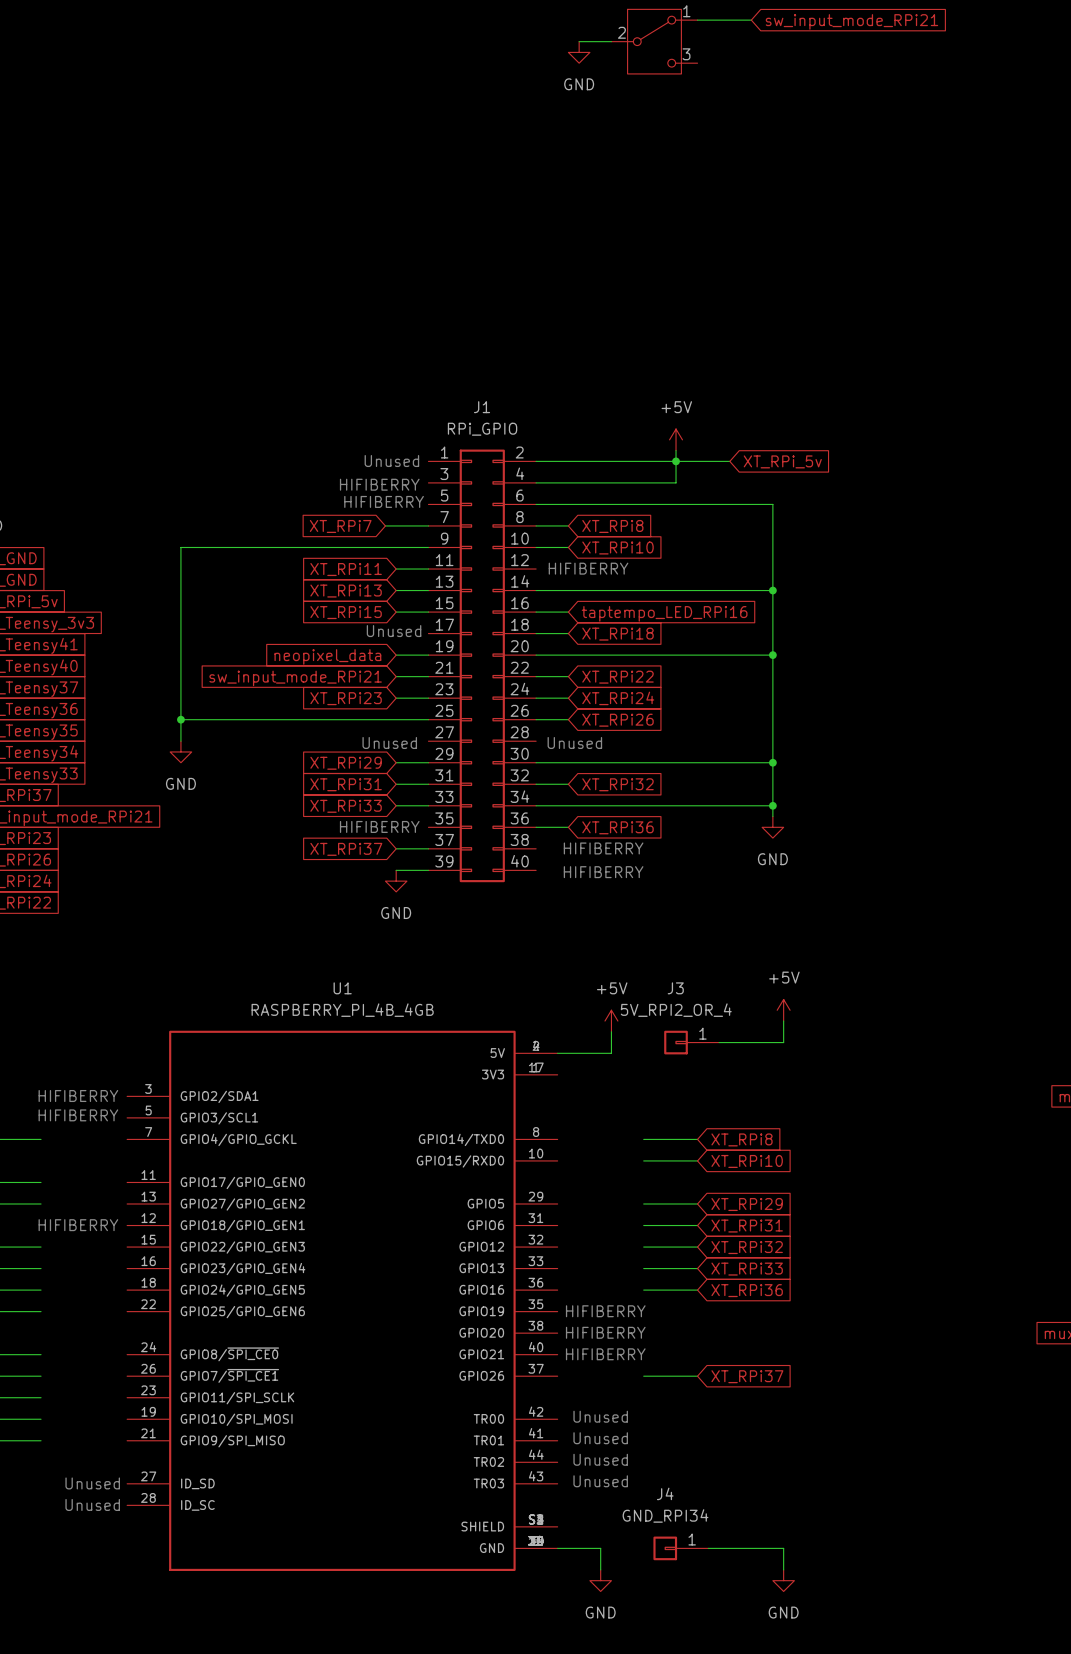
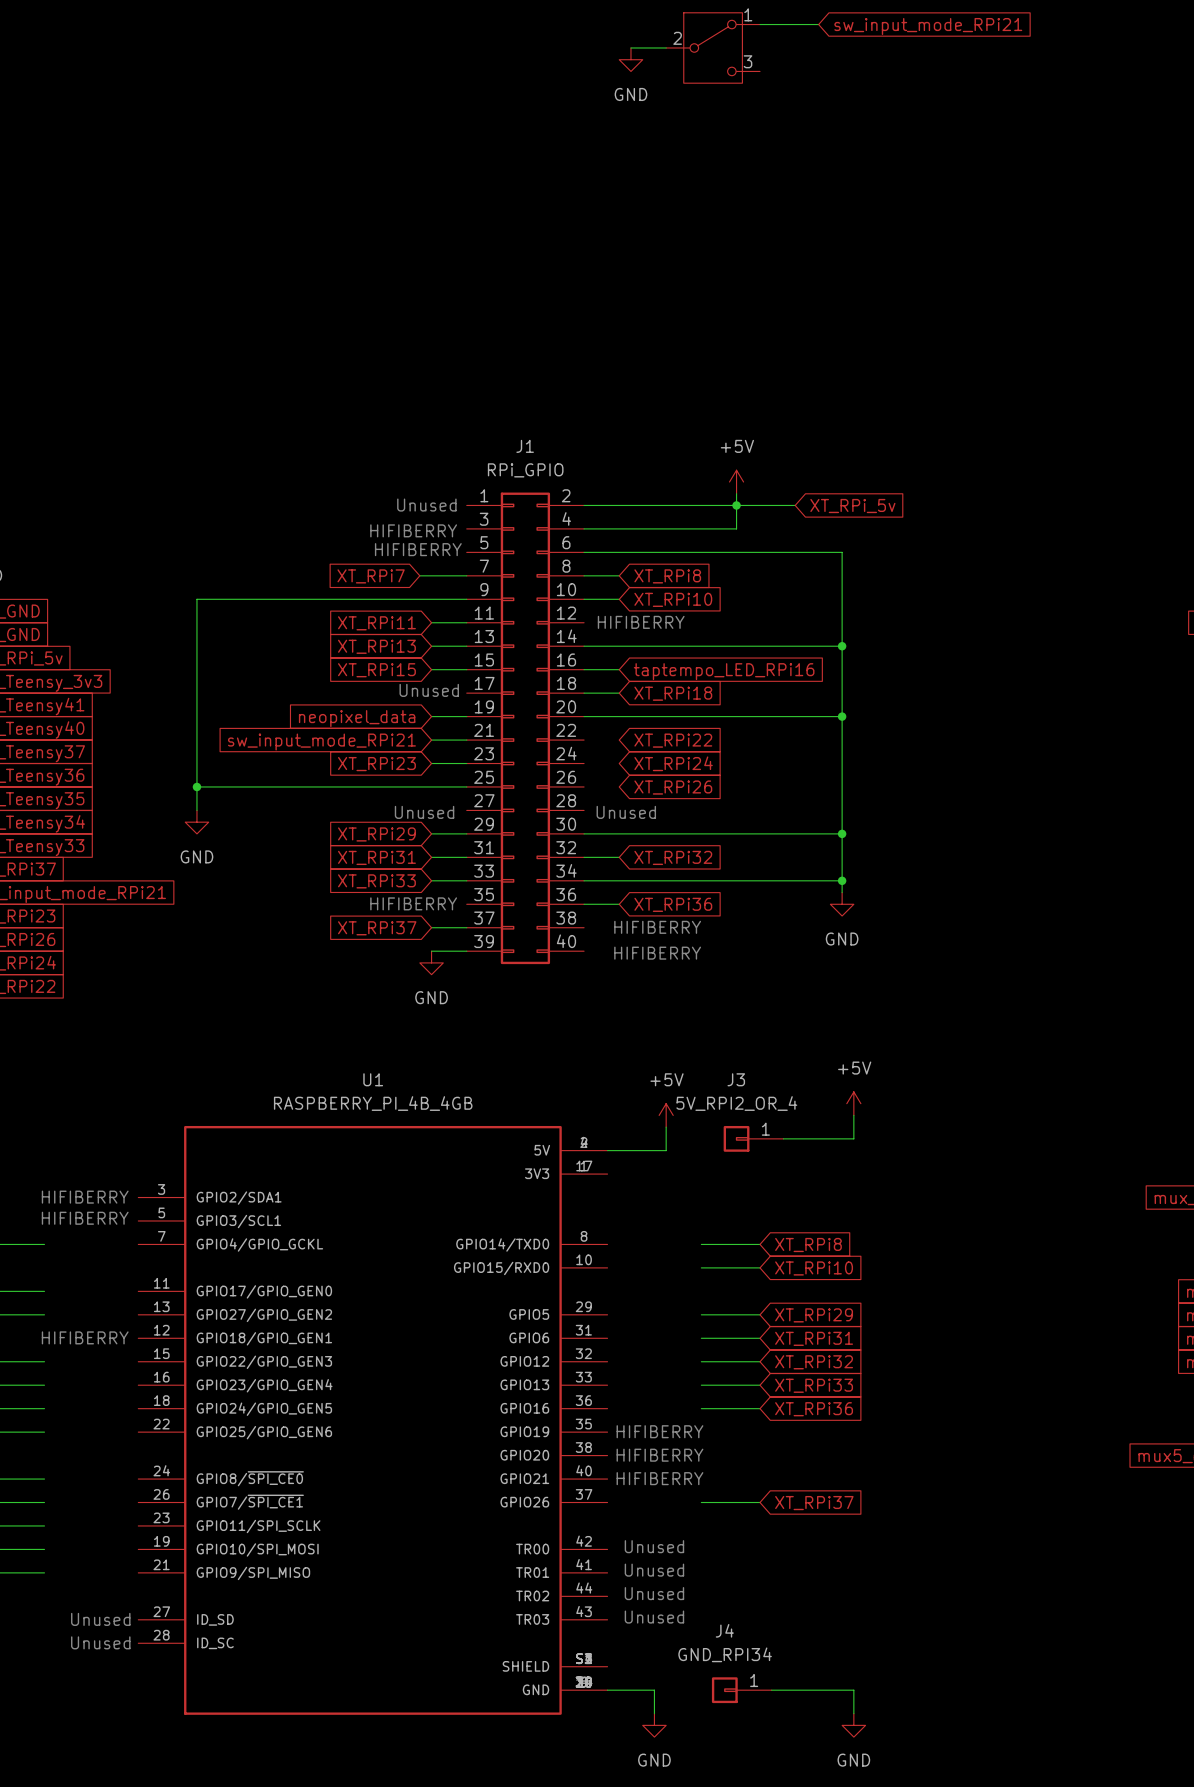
wire: (536, 676) (568, 676) -> none
wire: (536, 698) (568, 698) -> none
wire: (536, 719) (568, 719) -> none

